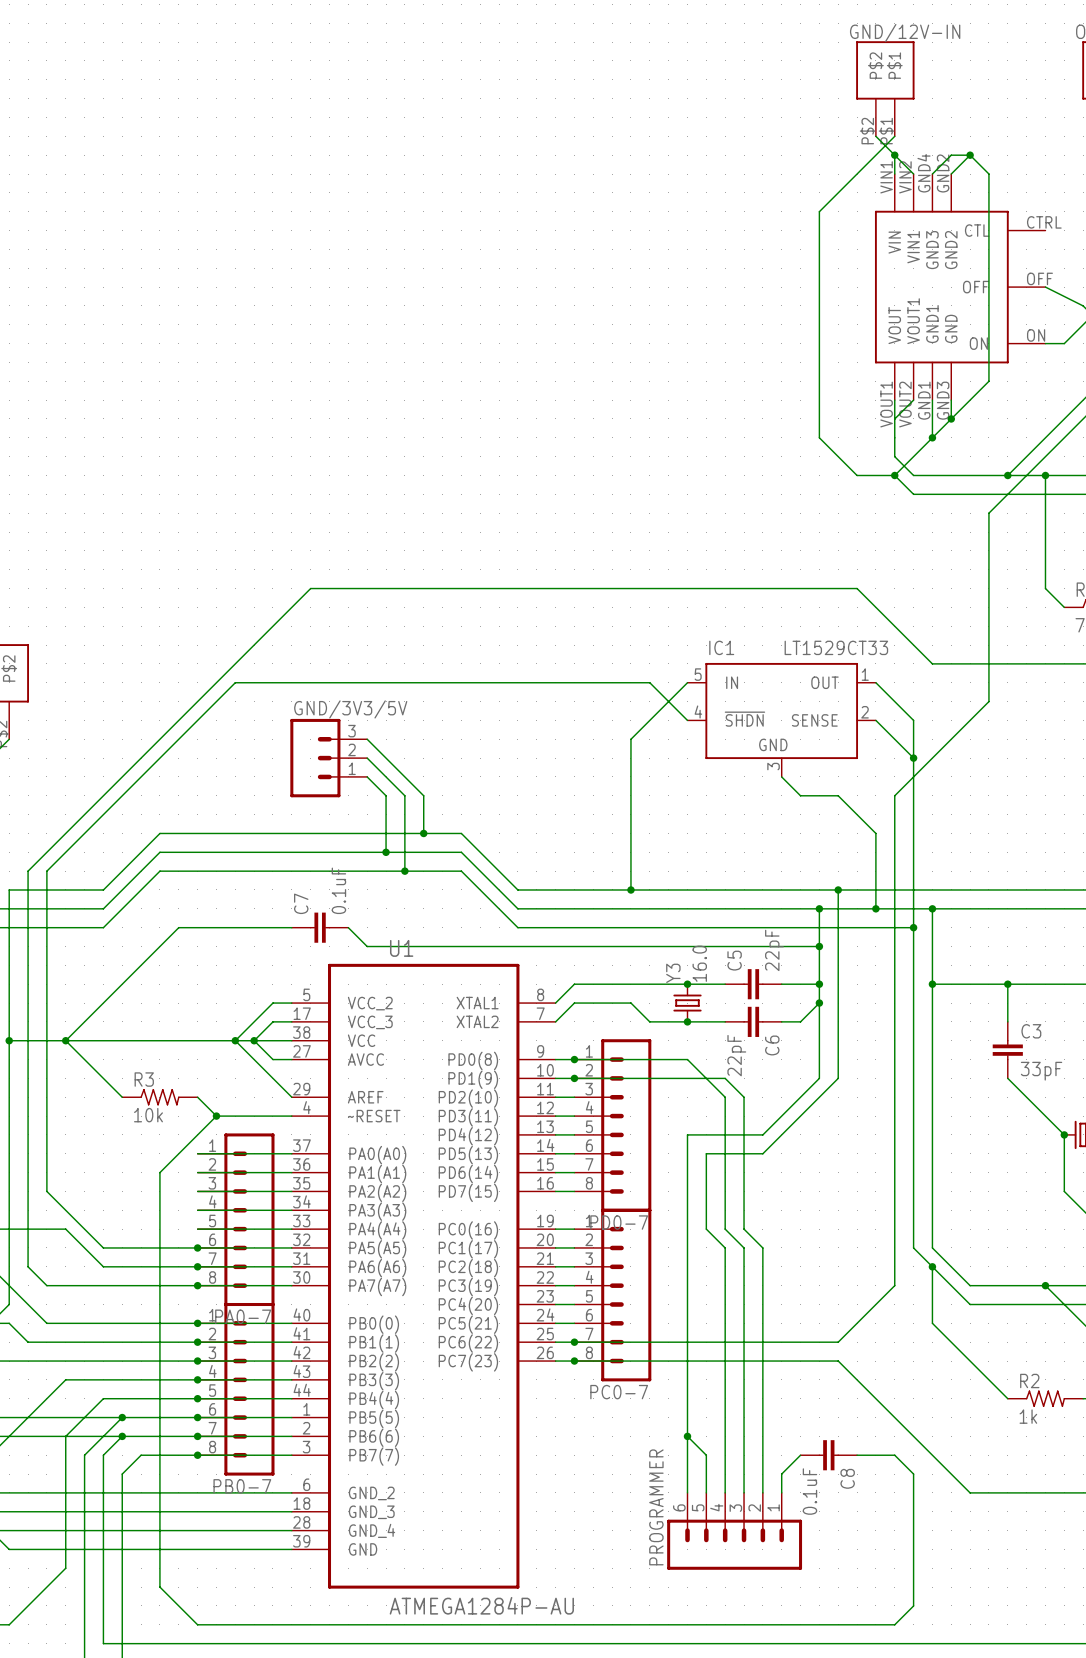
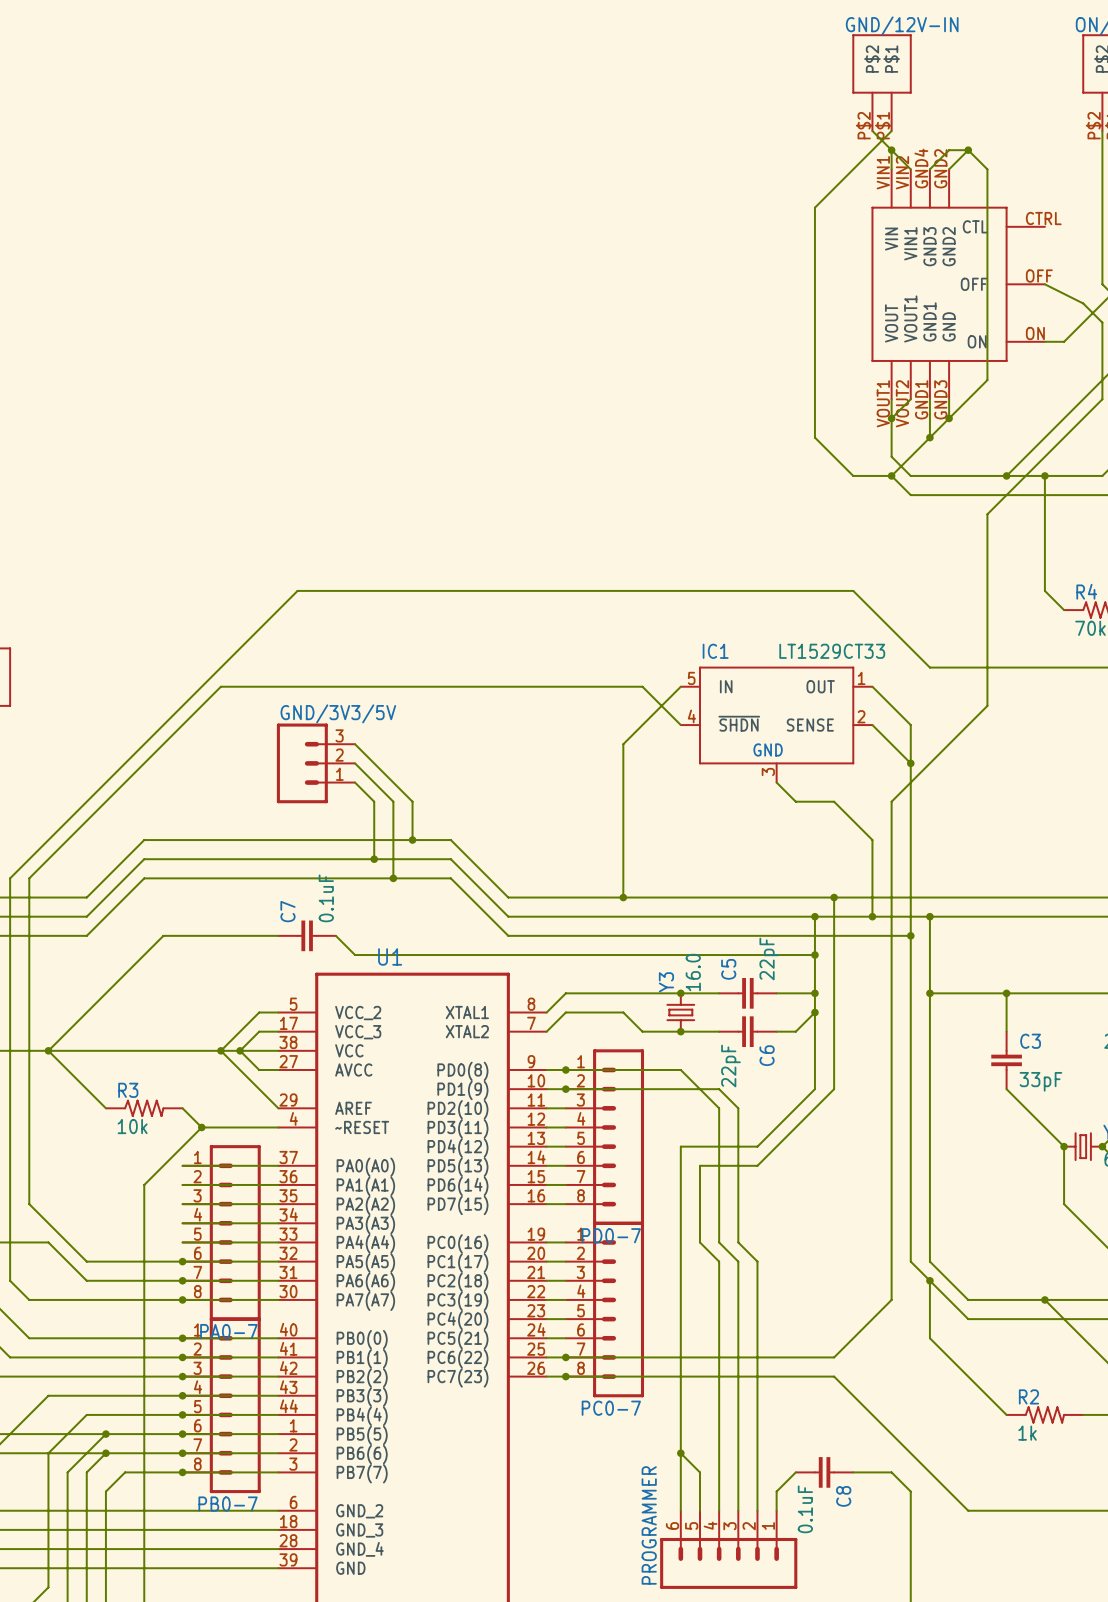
junction: none -> (891, 418)

